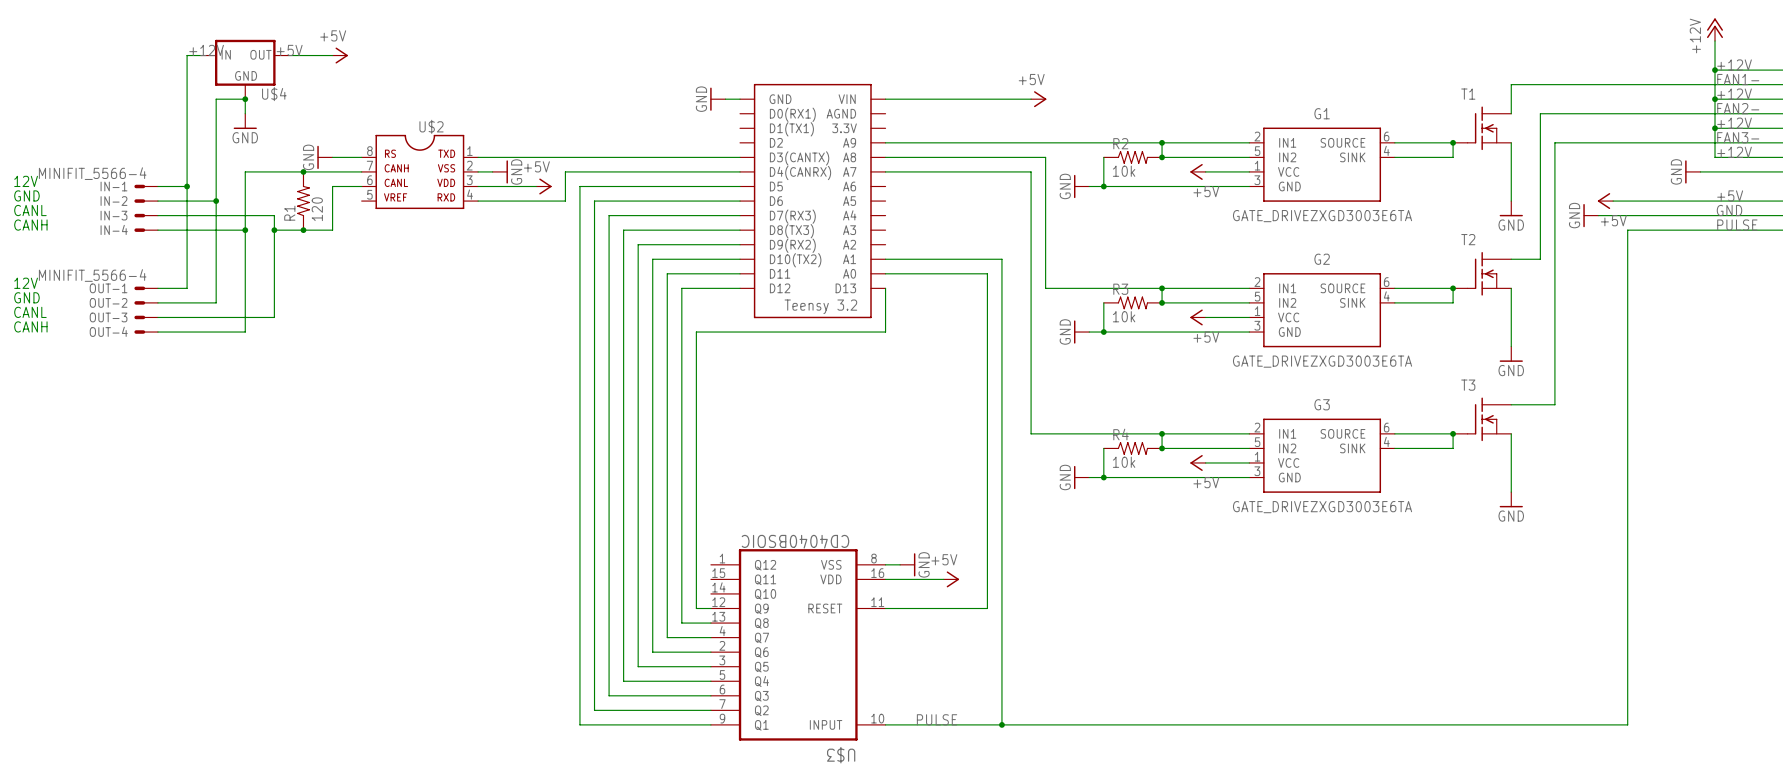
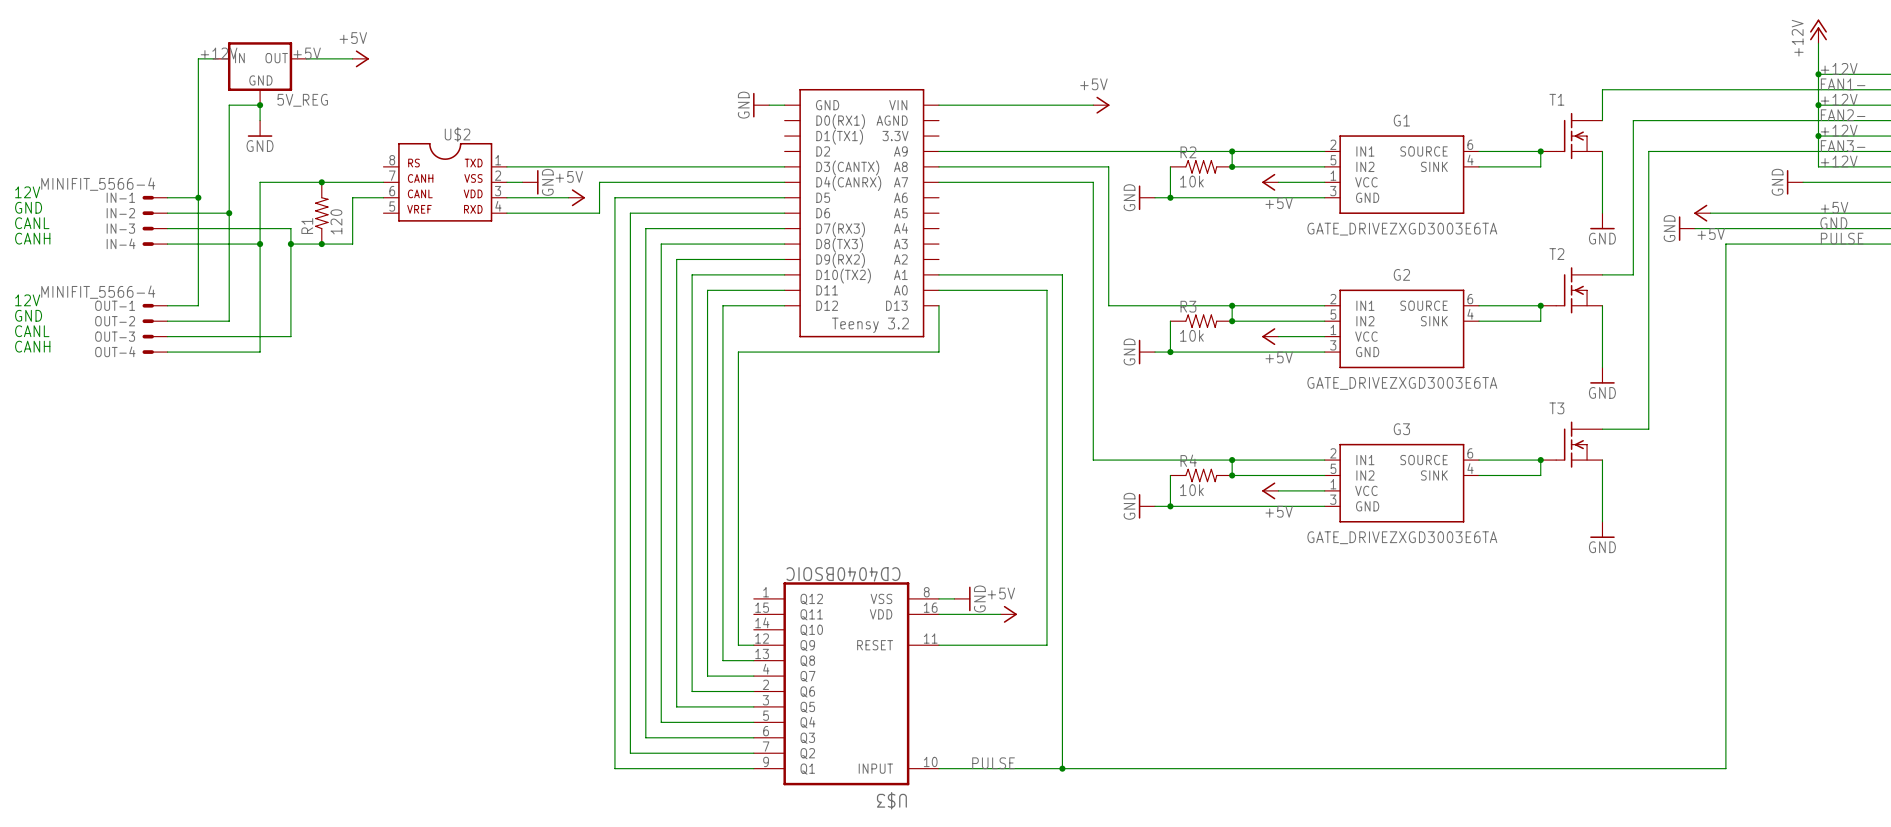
U$4 name: U$4 (274, 94) -> 5V_REG (302, 100)
power symbol: GND (324, 157) -> none
wire: (332, 157) (361, 157) -> none

